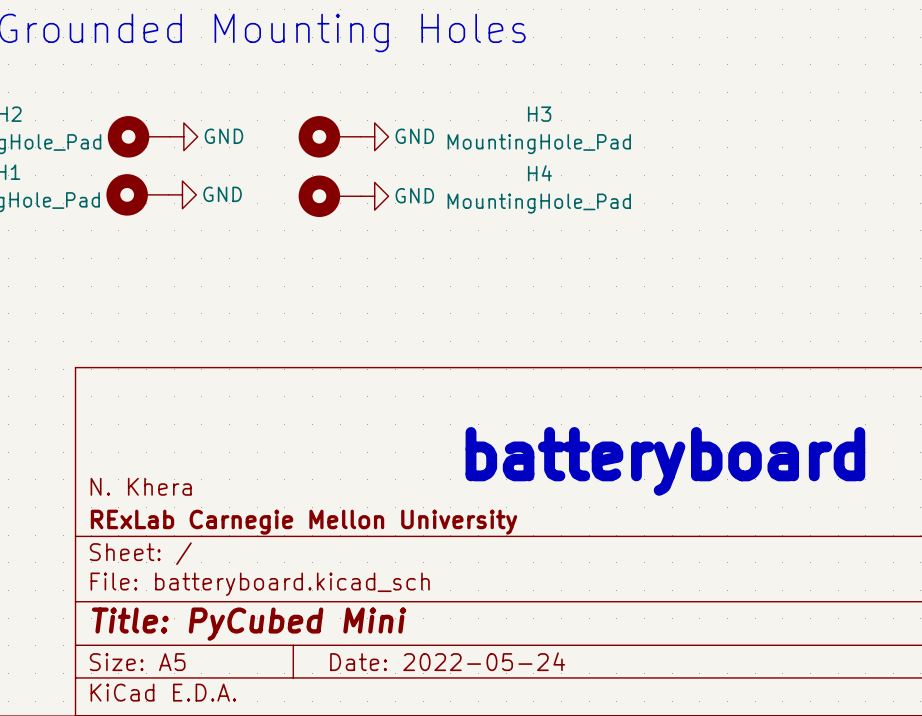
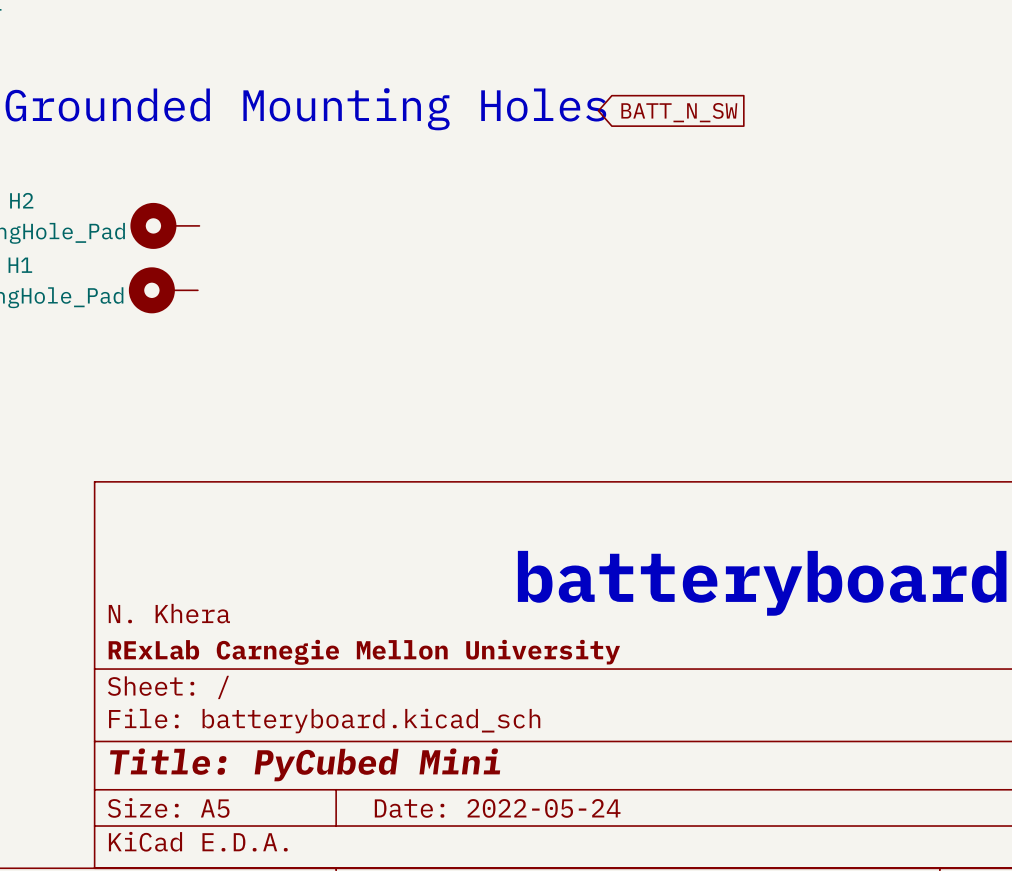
global label: none -> BATT_N_SW (679, 112)
power symbol: GND (183, 136) -> none
H3: MountingHole_Pad (329, 136) -> none
power symbol: GND (374, 136) -> none
power symbol: GND (182, 194) -> none
H4: MountingHole_Pad (329, 196) -> none
power symbol: GND (374, 196) -> none

